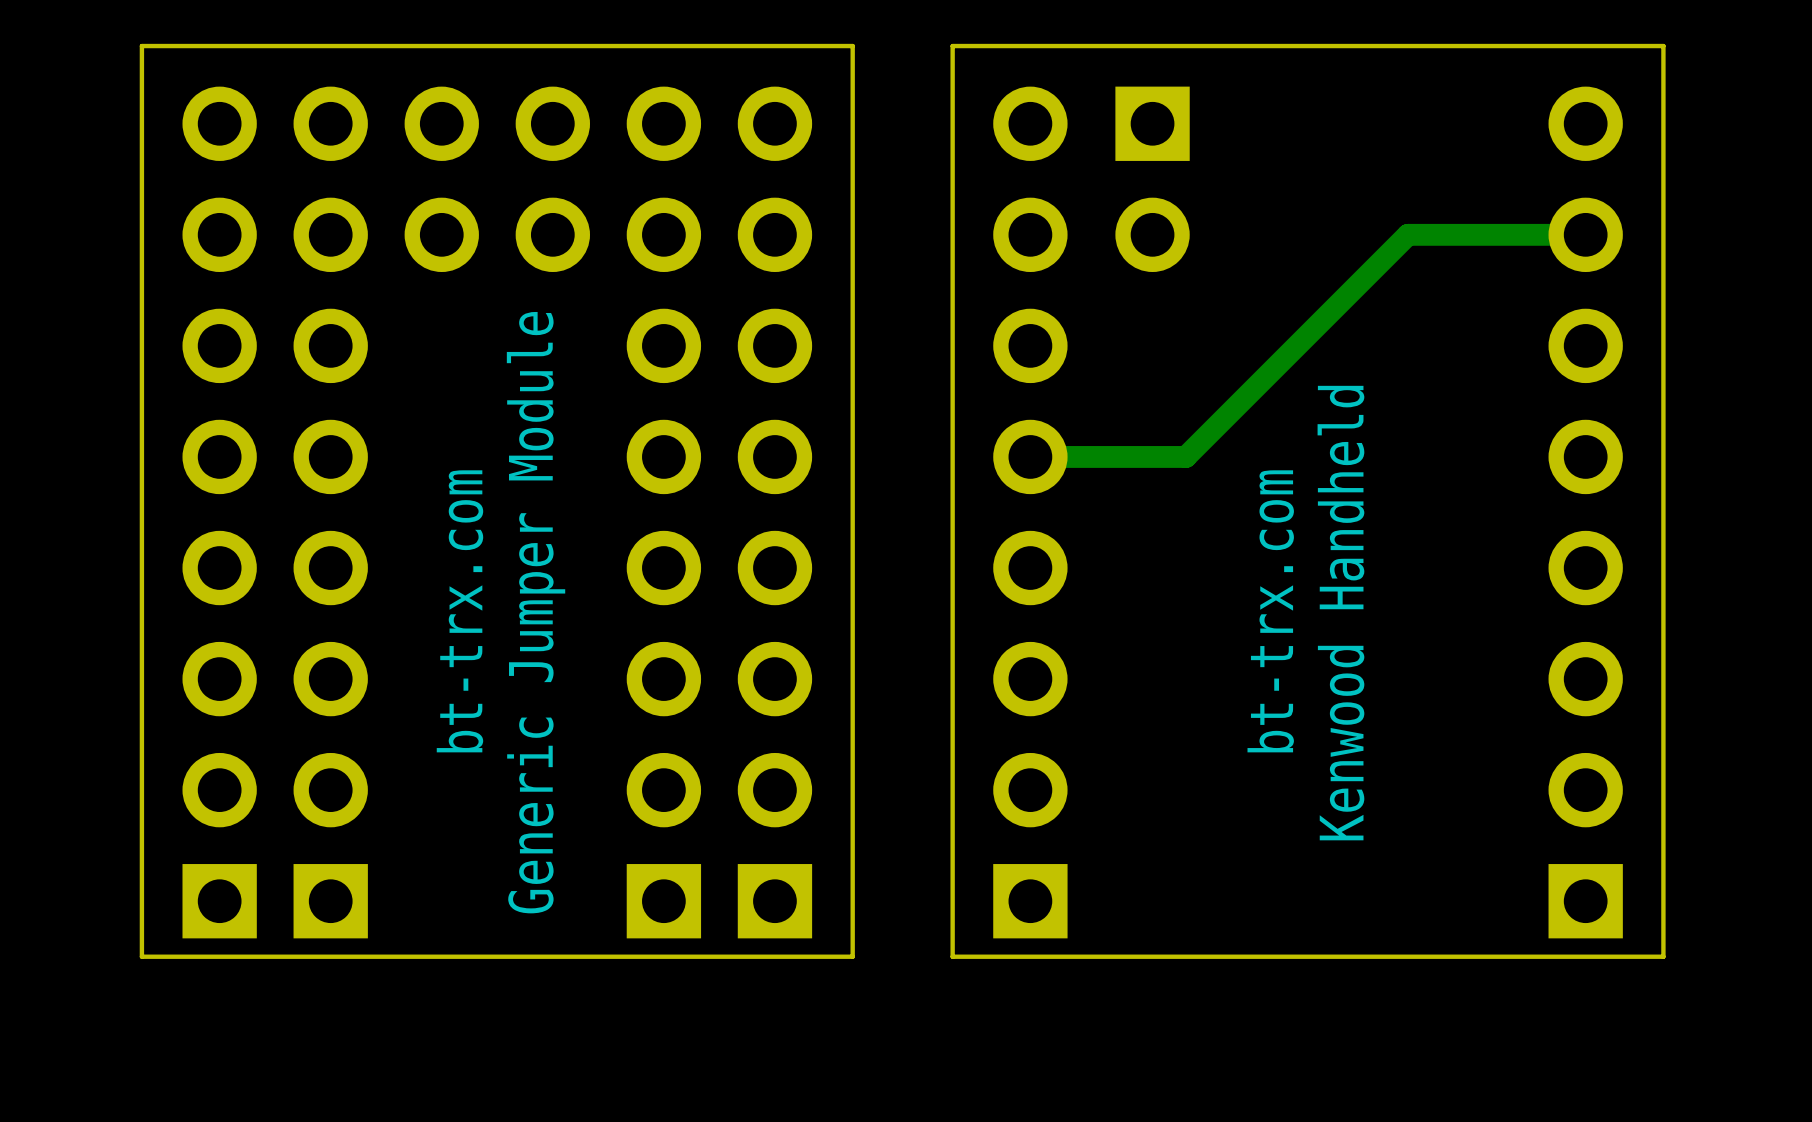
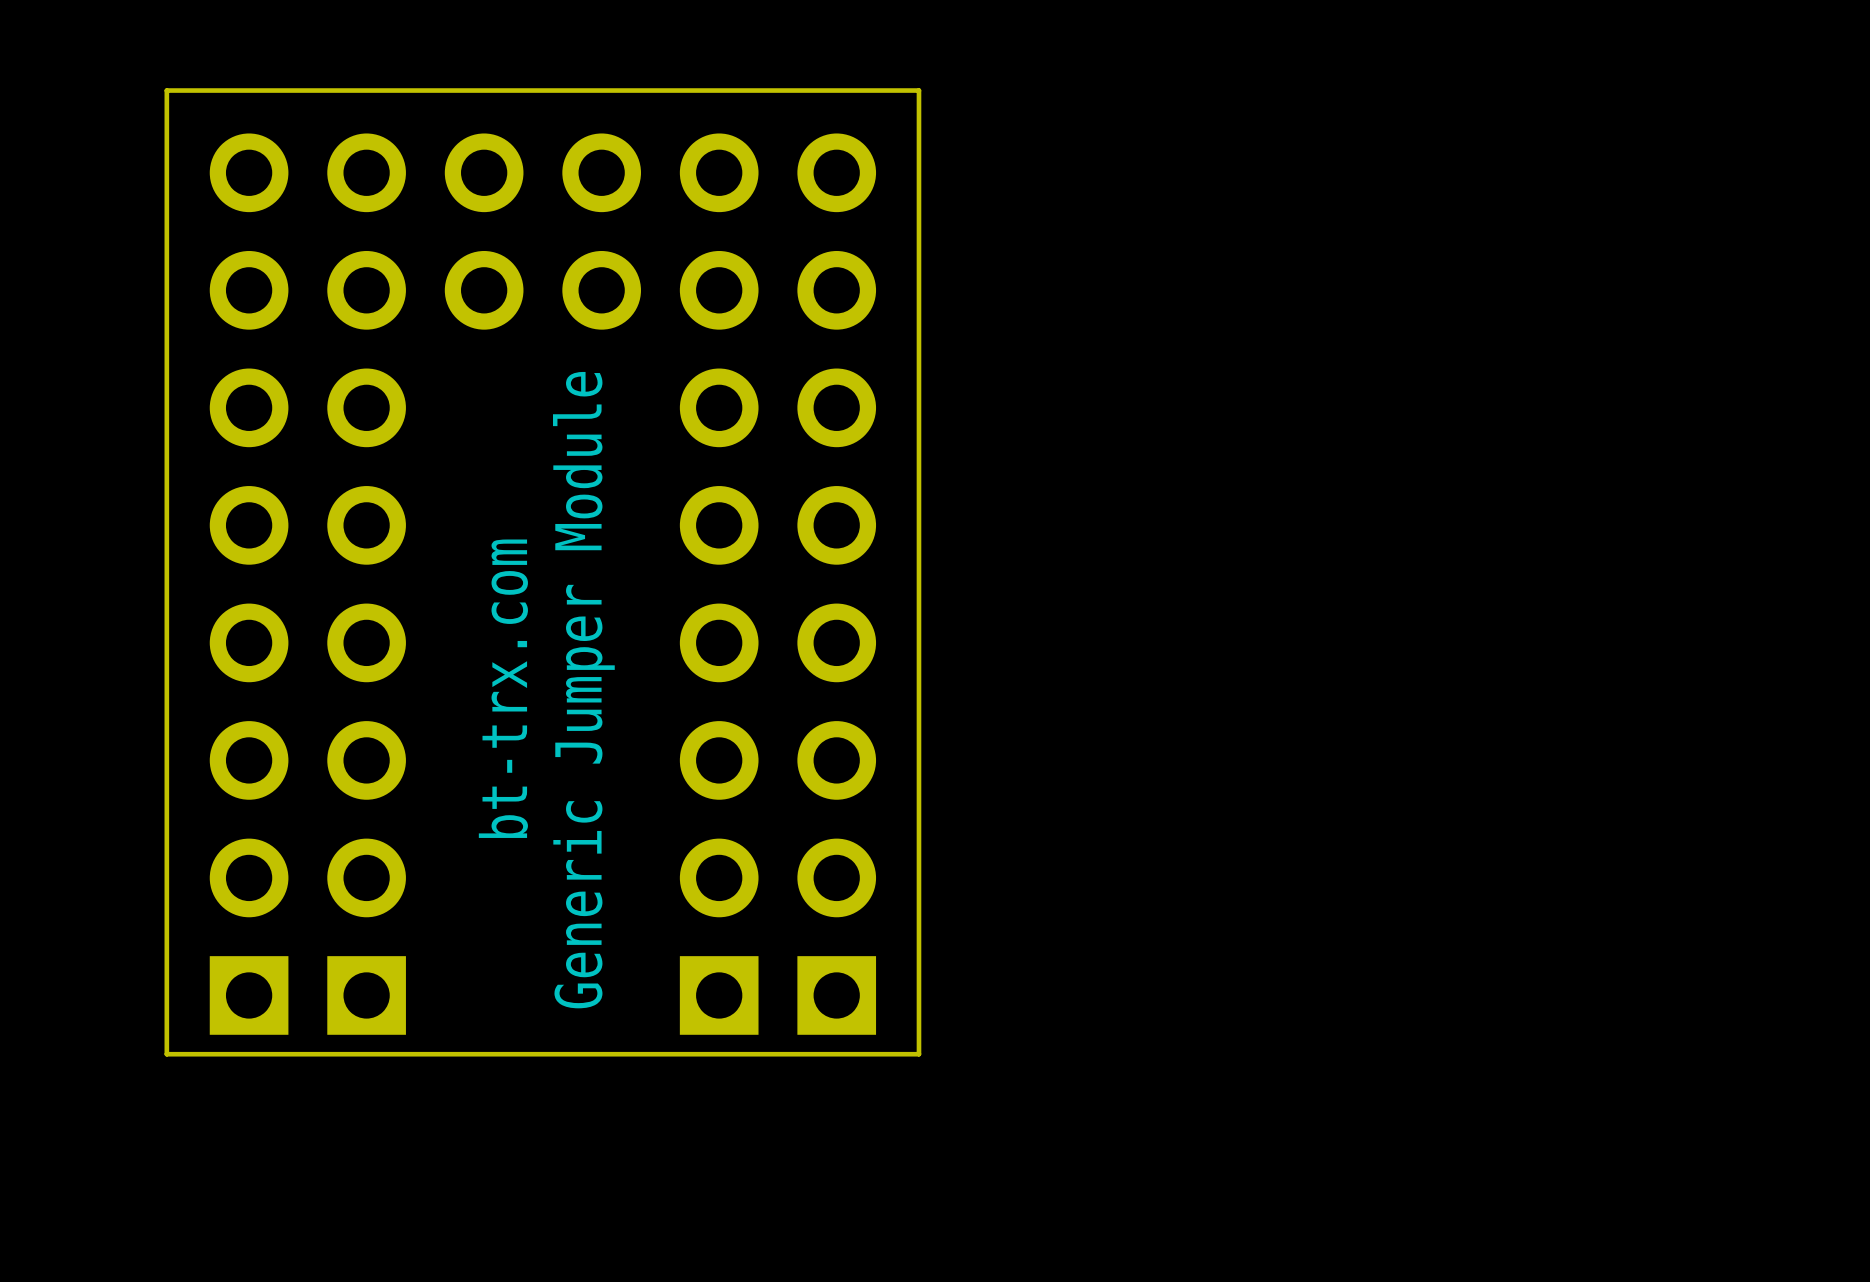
board edge: (1663, 46) (952, 46) (952, 956) (1663, 956) (1663, 46) -> none
part: (1152, 179) -> none
track: (1585, 234) (1407, 234) (1185, 456) (1030, 456) -> none
part: (1030, 512) -> none
part: (1585, 512) -> none
text: bt-trx.com (1270, 611) -> none
text: Kenwood Handheld (1340, 613) -> none

